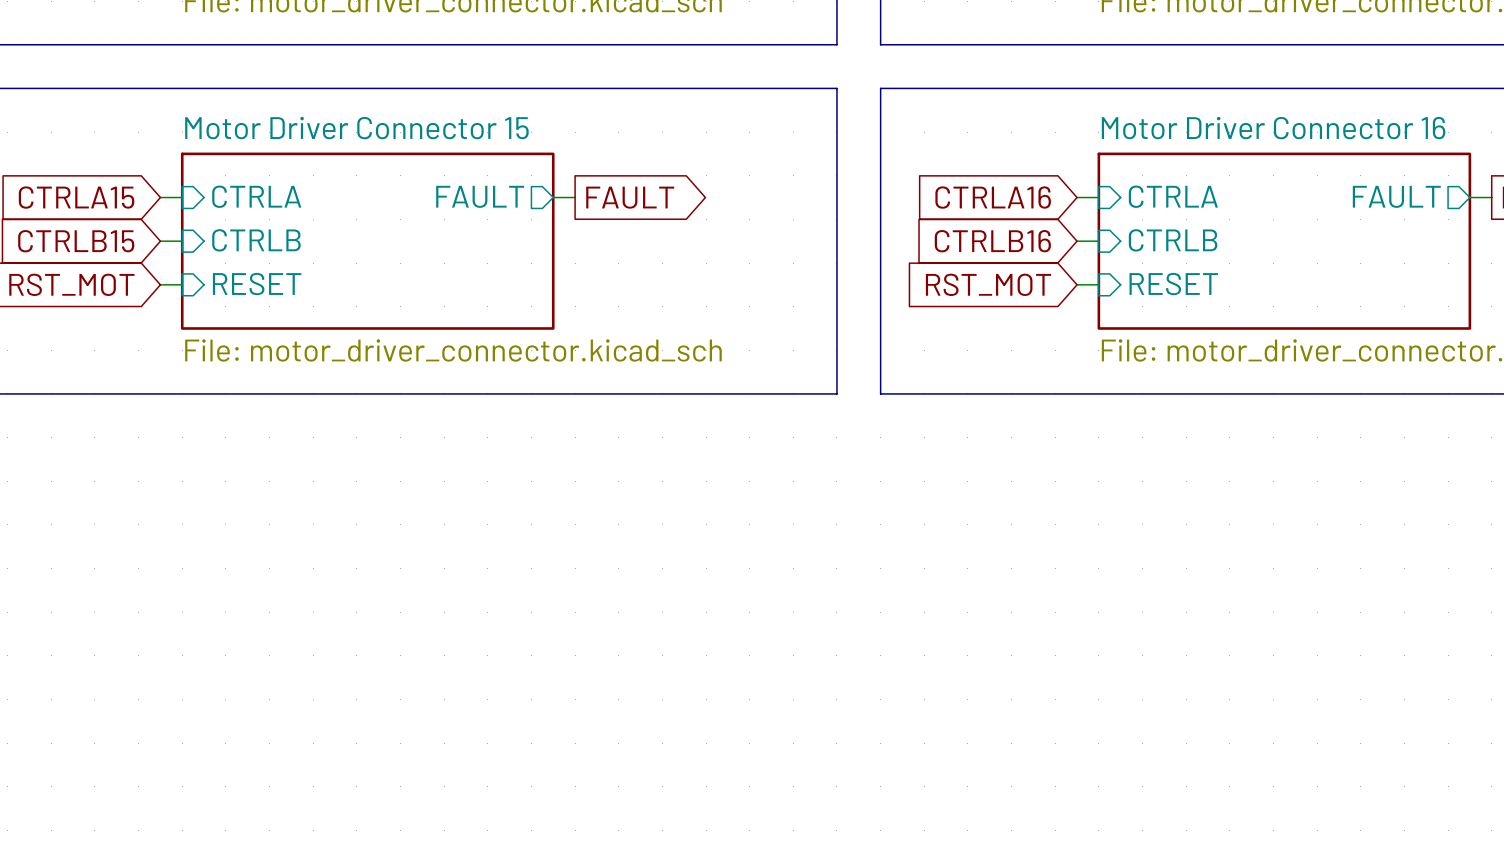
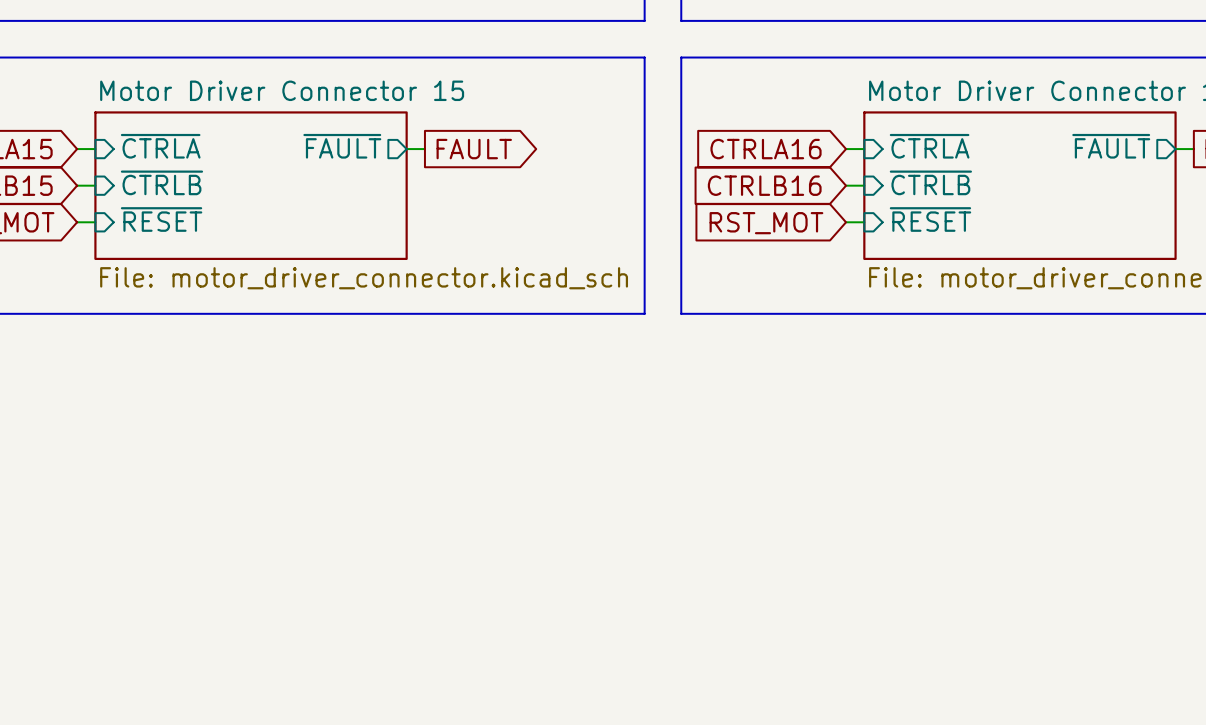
sheet pin: CTRLA (256, 196) -> ~{CTRLA} (160, 146)
sheet pin: FAULT (480, 196) -> ~{FAULT} (342, 146)
sheet pin: CTRLA (1173, 196) -> ~{CTRLA} (929, 146)
sheet pin: FAULT (1396, 196) -> ~{FAULT} (1111, 146)
sheet pin: CTRLB (256, 240) -> ~{CTRLB} (161, 182)
sheet pin: CTRLB (1173, 240) -> ~{CTRLB} (930, 182)
sheet pin: RESET (257, 284) -> ~{RESET} (161, 219)
sheet pin: RESET (1173, 284) -> ~{RESET} (930, 219)

